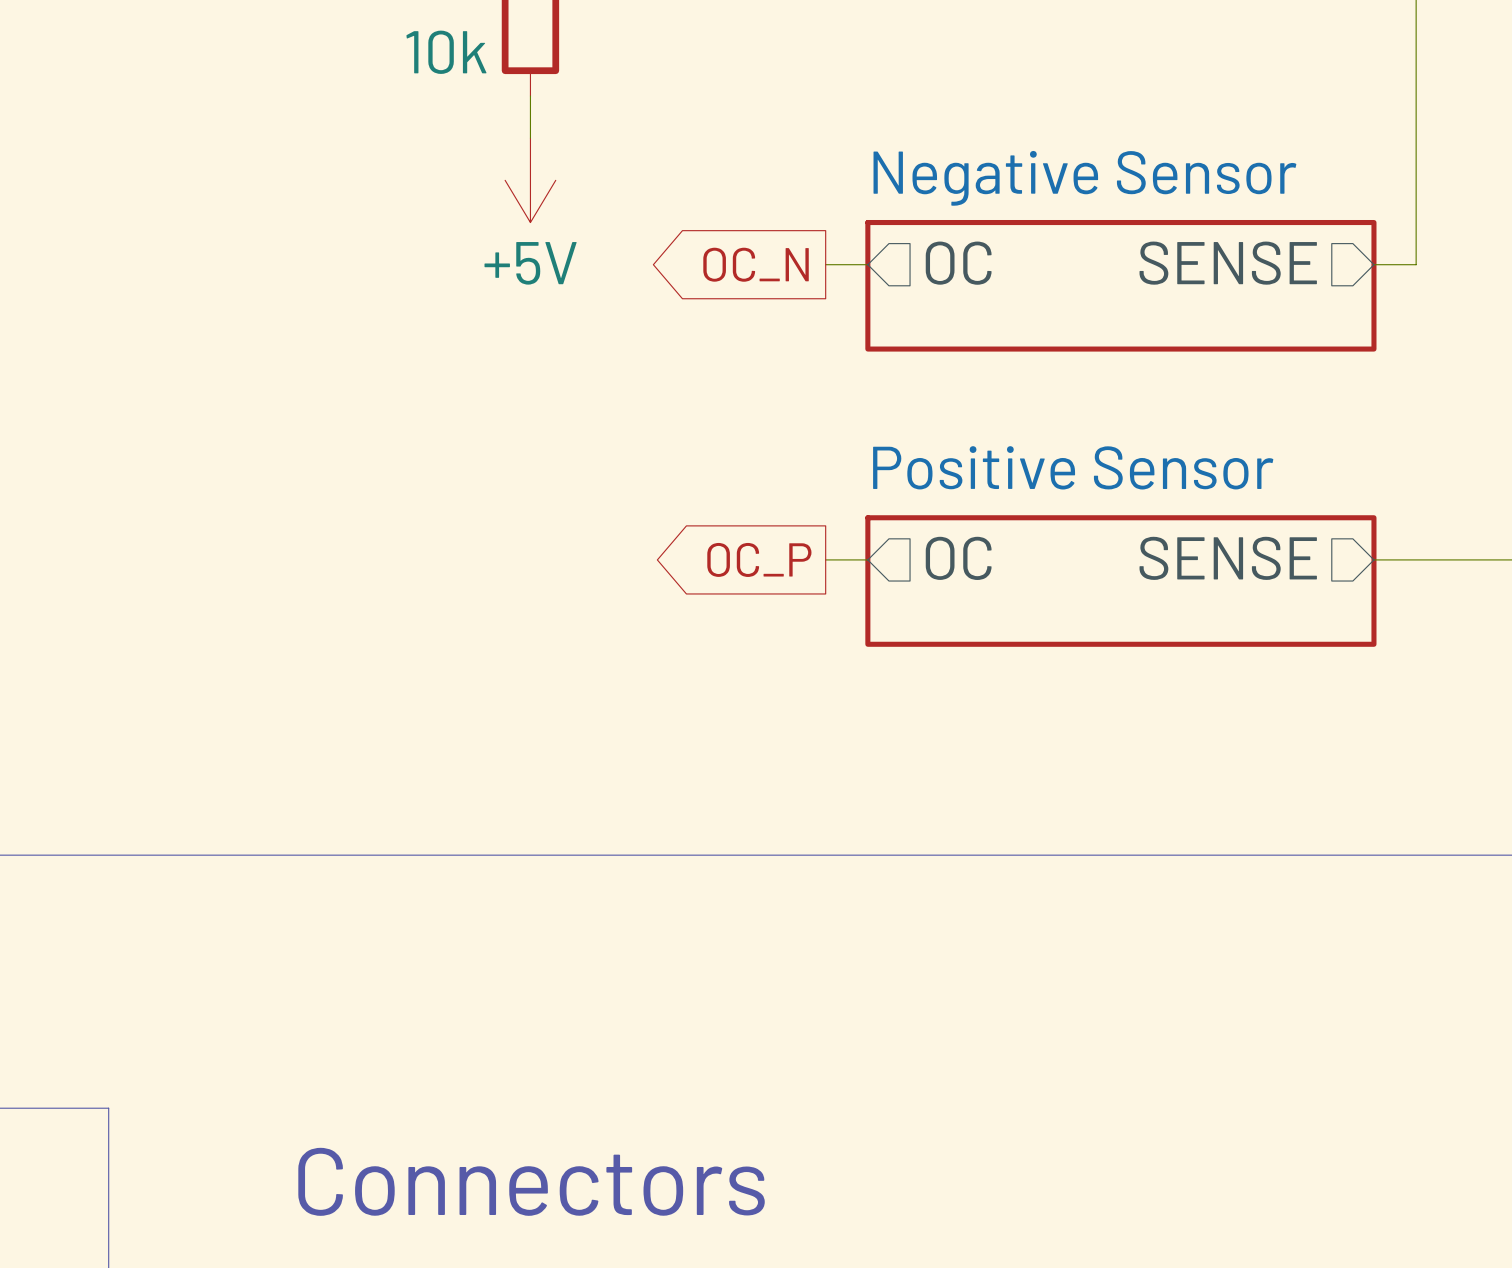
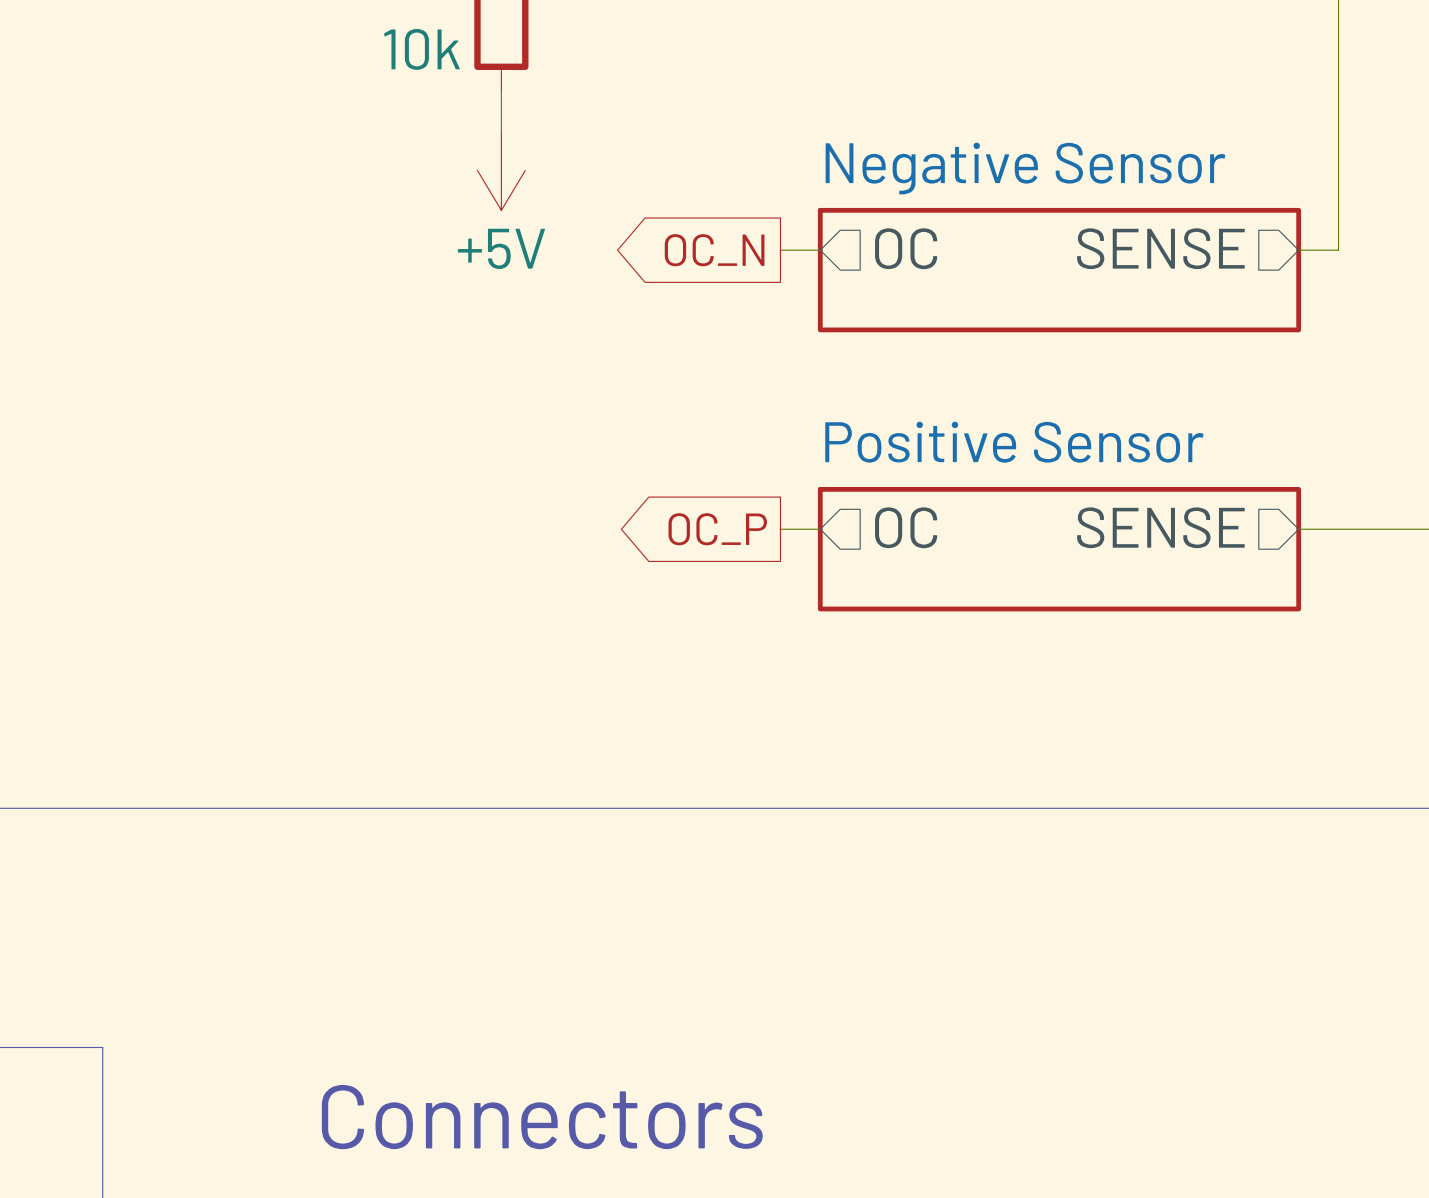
text position: Connectors (531, 1181) -> Connectors (542, 1117)

